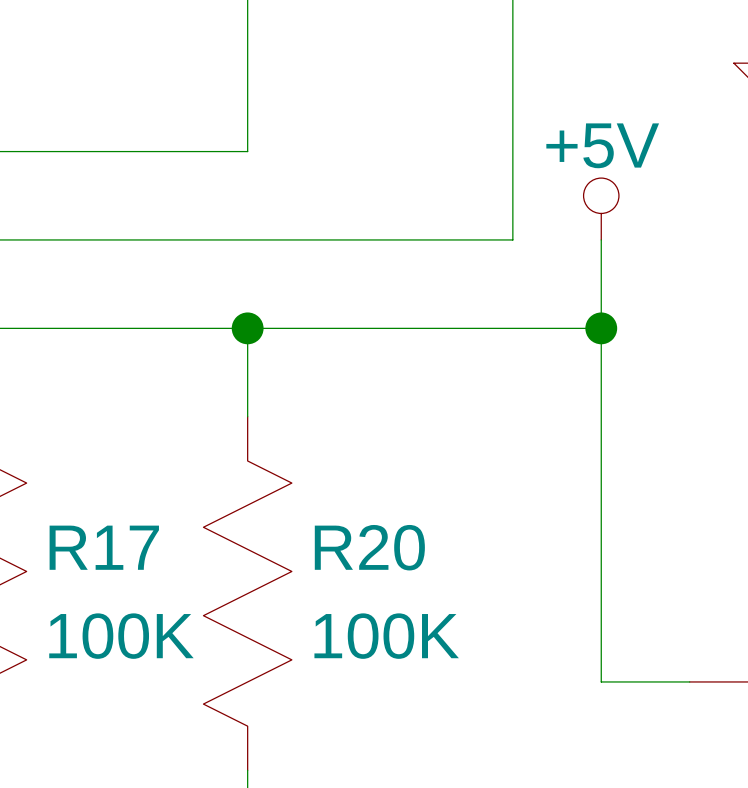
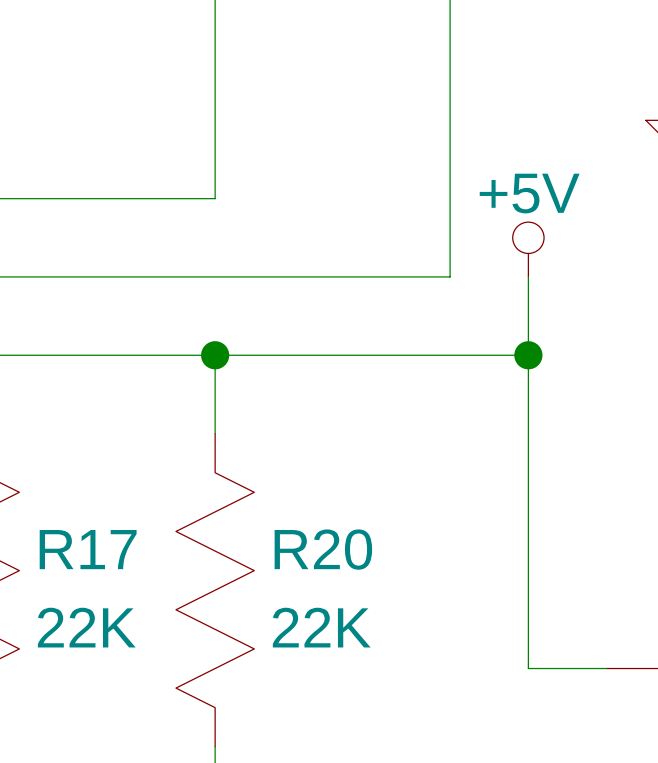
R17 value: 100K (121, 636) -> 22K (86, 627)
R20 value: 100K (386, 636) -> 22K (321, 627)

